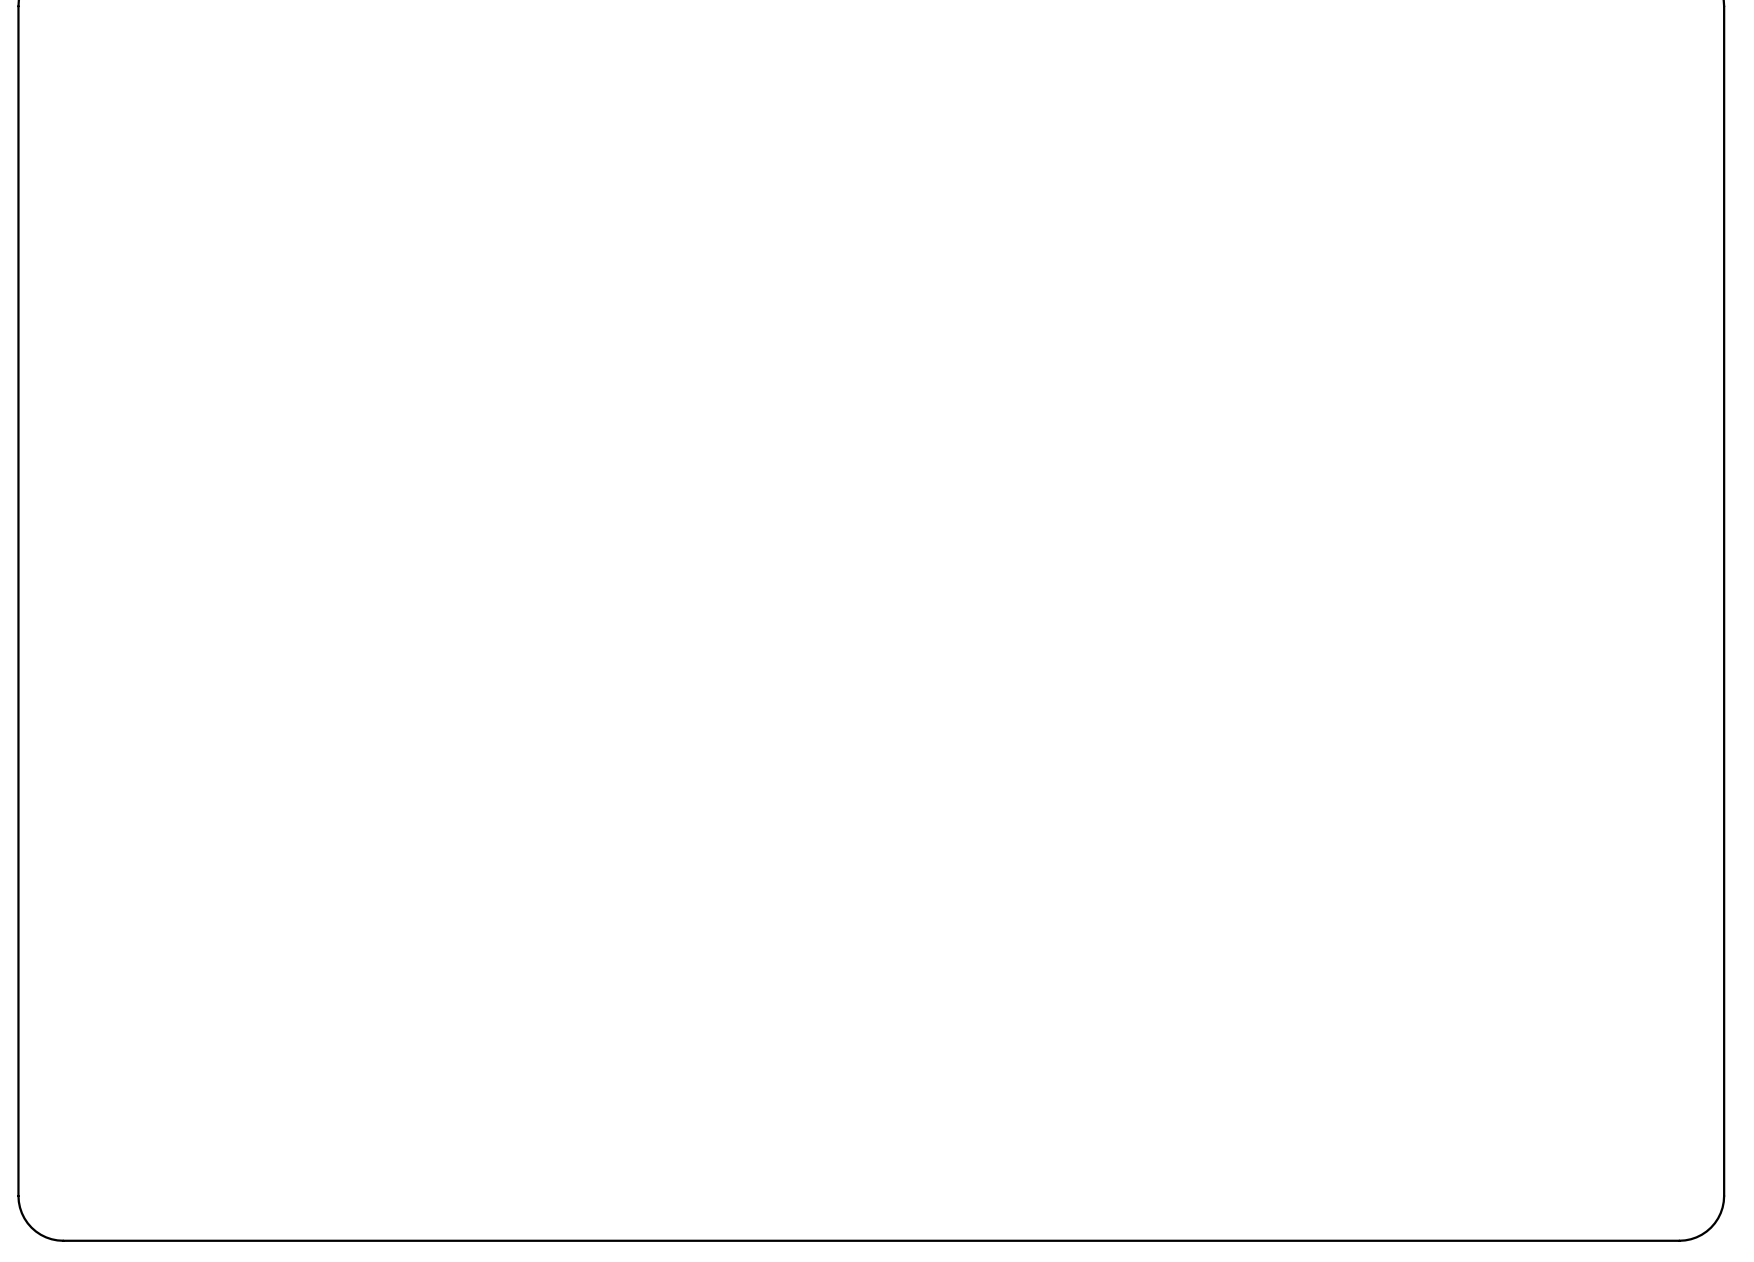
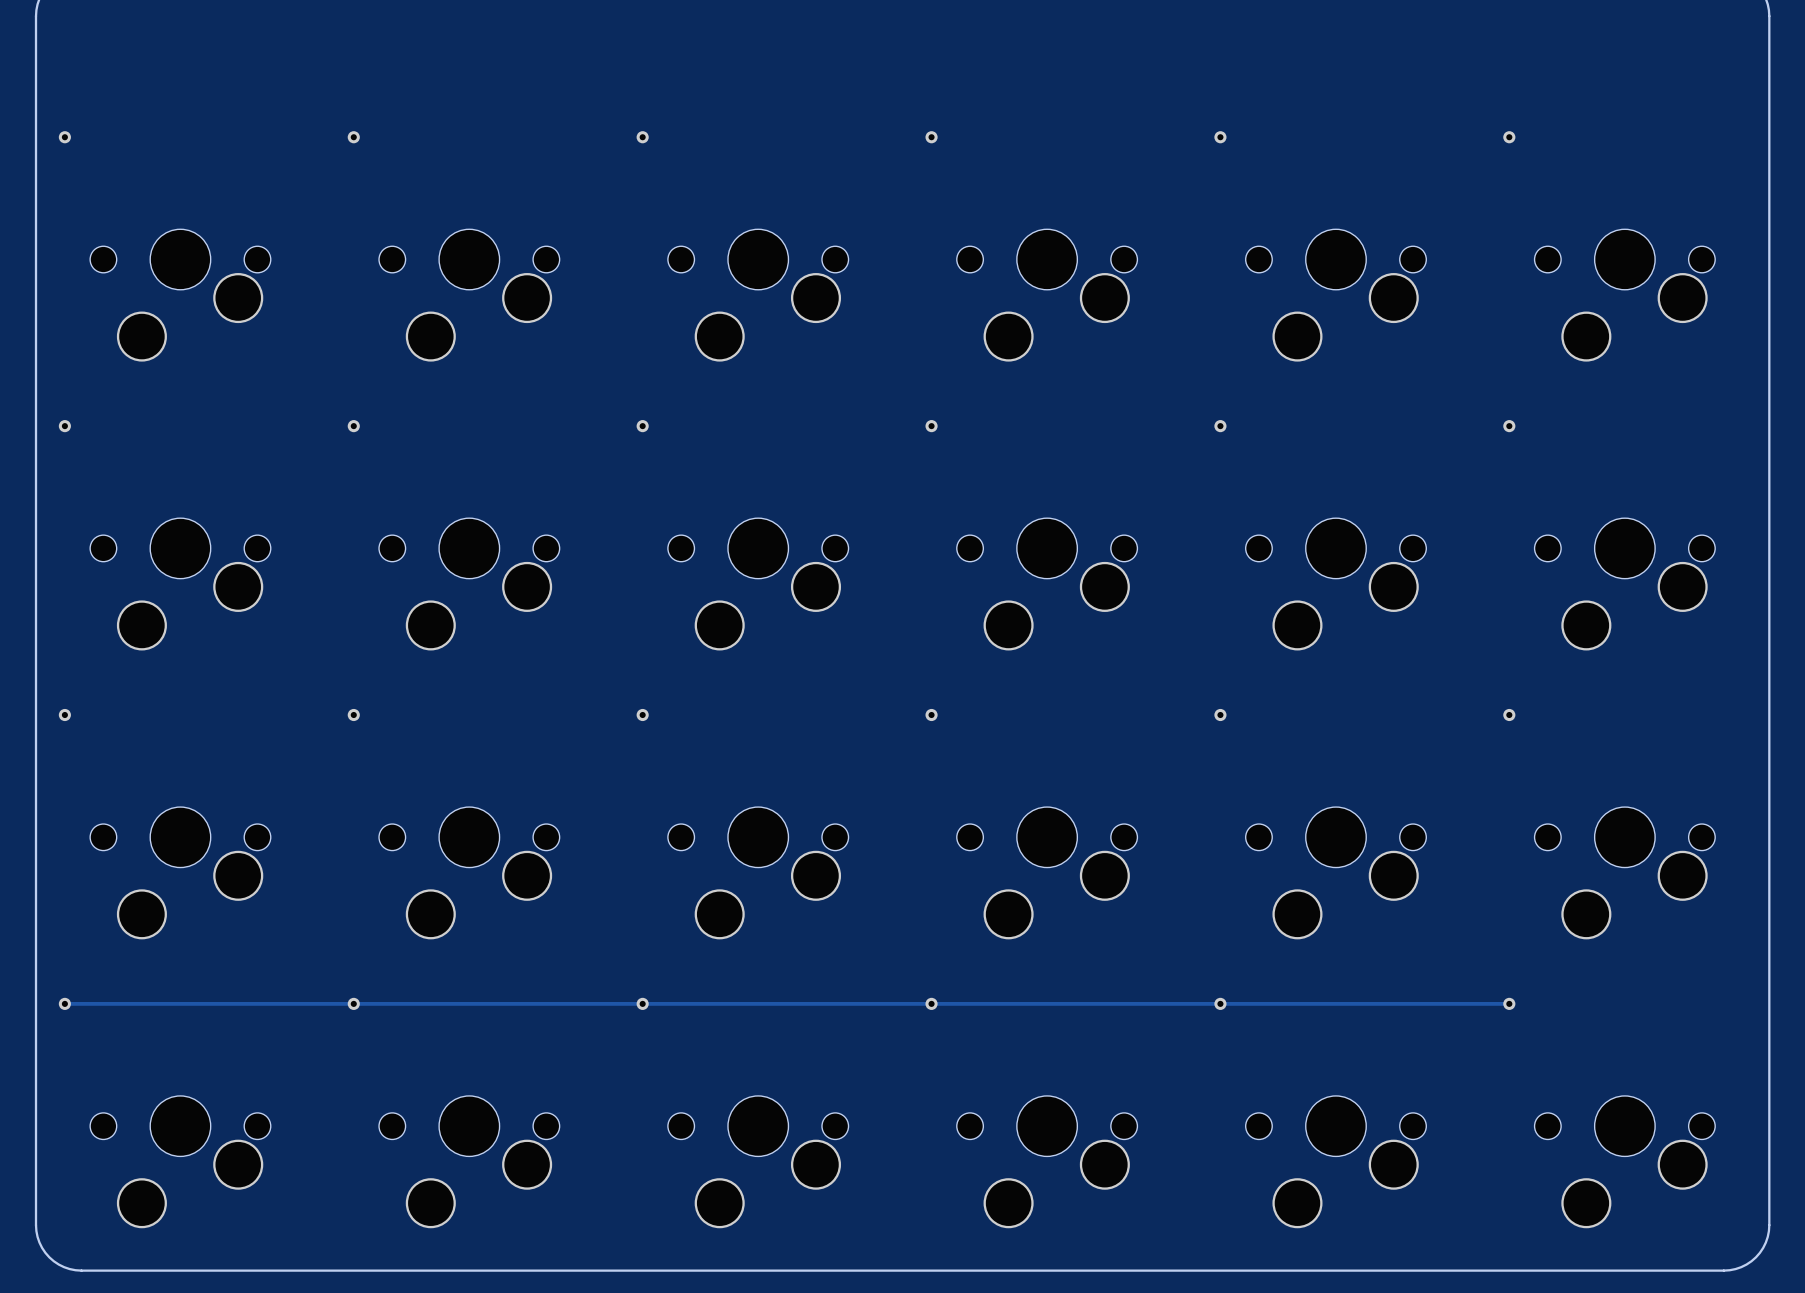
part: none -> (64, 137)
part: none -> (353, 137)
part: none -> (642, 137)
part: none -> (931, 137)
part: none -> (1220, 137)
part: none -> (1509, 137)
part: none -> (180, 295)
part: none -> (469, 295)
part: none -> (758, 295)
part: none -> (1047, 295)
part: none -> (1335, 295)
part: none -> (1624, 295)
part: none -> (64, 426)
part: none -> (353, 426)
part: none -> (642, 426)
part: none -> (931, 426)
part: none -> (1220, 426)
part: none -> (1509, 426)
part: none -> (180, 584)
part: none -> (469, 584)
part: none -> (758, 584)
part: none -> (1047, 584)
part: none -> (1335, 584)
part: none -> (1624, 584)
part: none -> (64, 715)
part: none -> (353, 715)
part: none -> (642, 715)
part: none -> (931, 715)
part: none -> (1220, 715)
part: none -> (1509, 715)
part: none -> (180, 873)
part: none -> (469, 873)
part: none -> (758, 873)
part: none -> (1047, 873)
part: none -> (1335, 873)
part: none -> (1624, 873)
track: none -> (64, 1003) (1509, 1003)
part: none -> (64, 1003)
part: none -> (353, 1003)
part: none -> (642, 1003)
part: none -> (931, 1003)
part: none -> (1220, 1003)
part: none -> (1509, 1003)
part: none -> (180, 1162)
part: none -> (469, 1162)
part: none -> (758, 1162)
part: none -> (1047, 1162)
part: none -> (1335, 1162)
part: none -> (1624, 1162)

